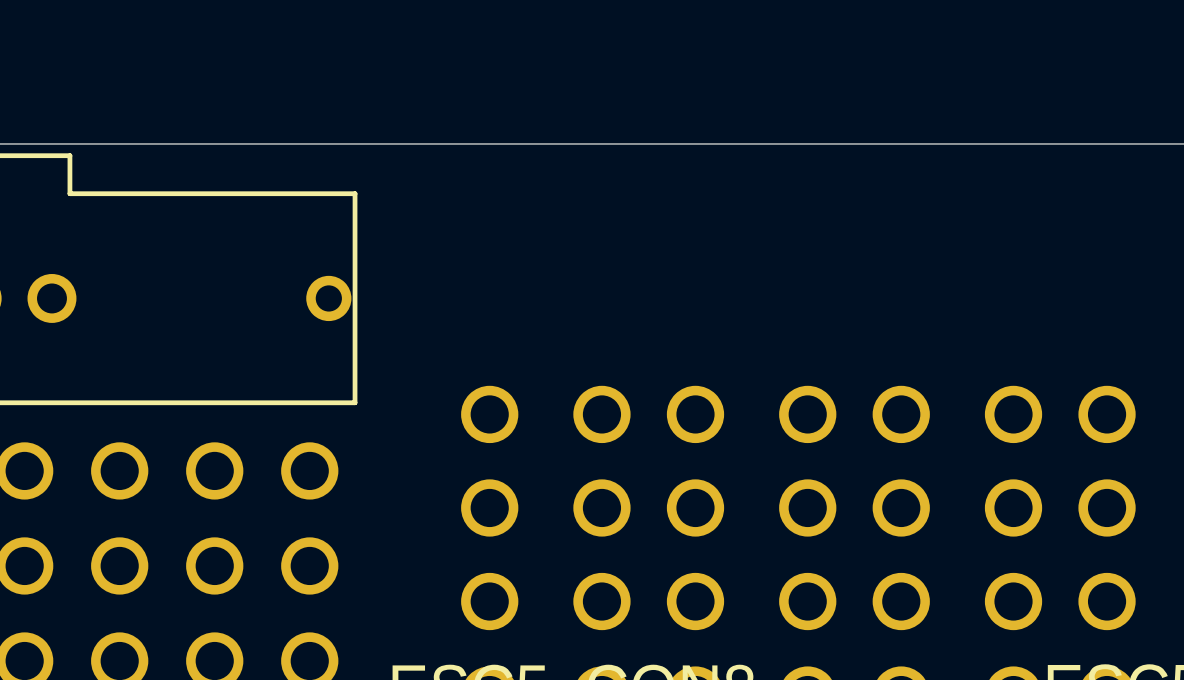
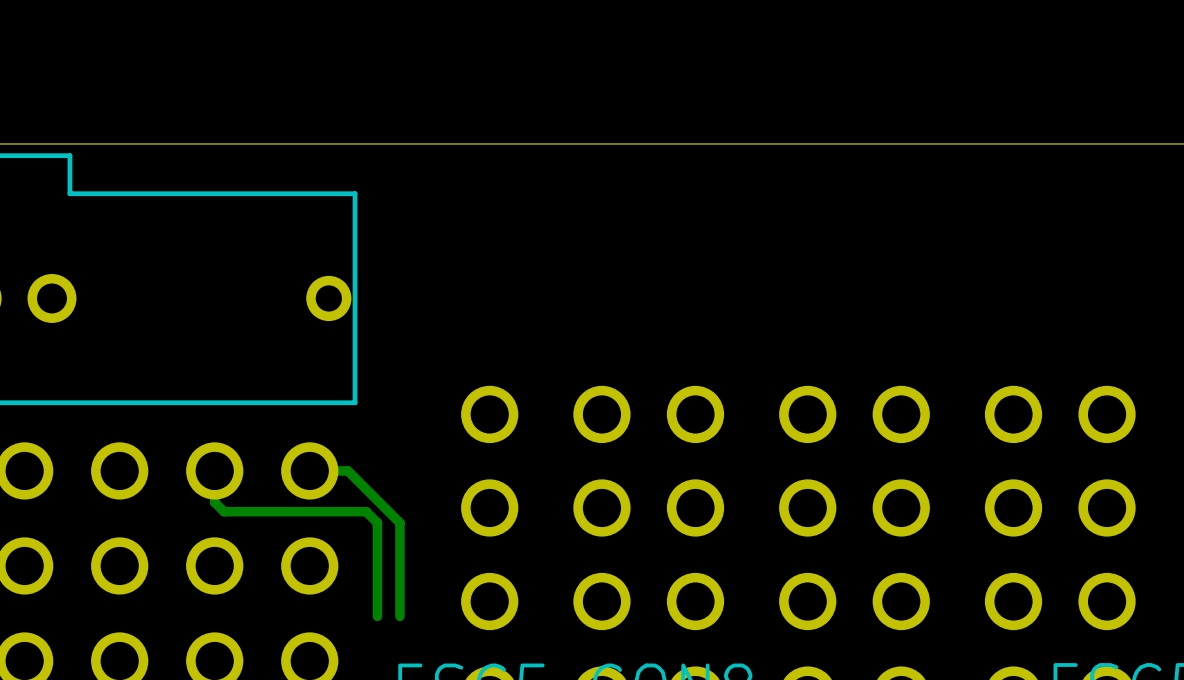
track: none -> (214, 470) (214, 502) (224, 511) (366, 511) (377, 522) (377, 616)
track: none -> (309, 470) (347, 470) (399, 522) (399, 616)

